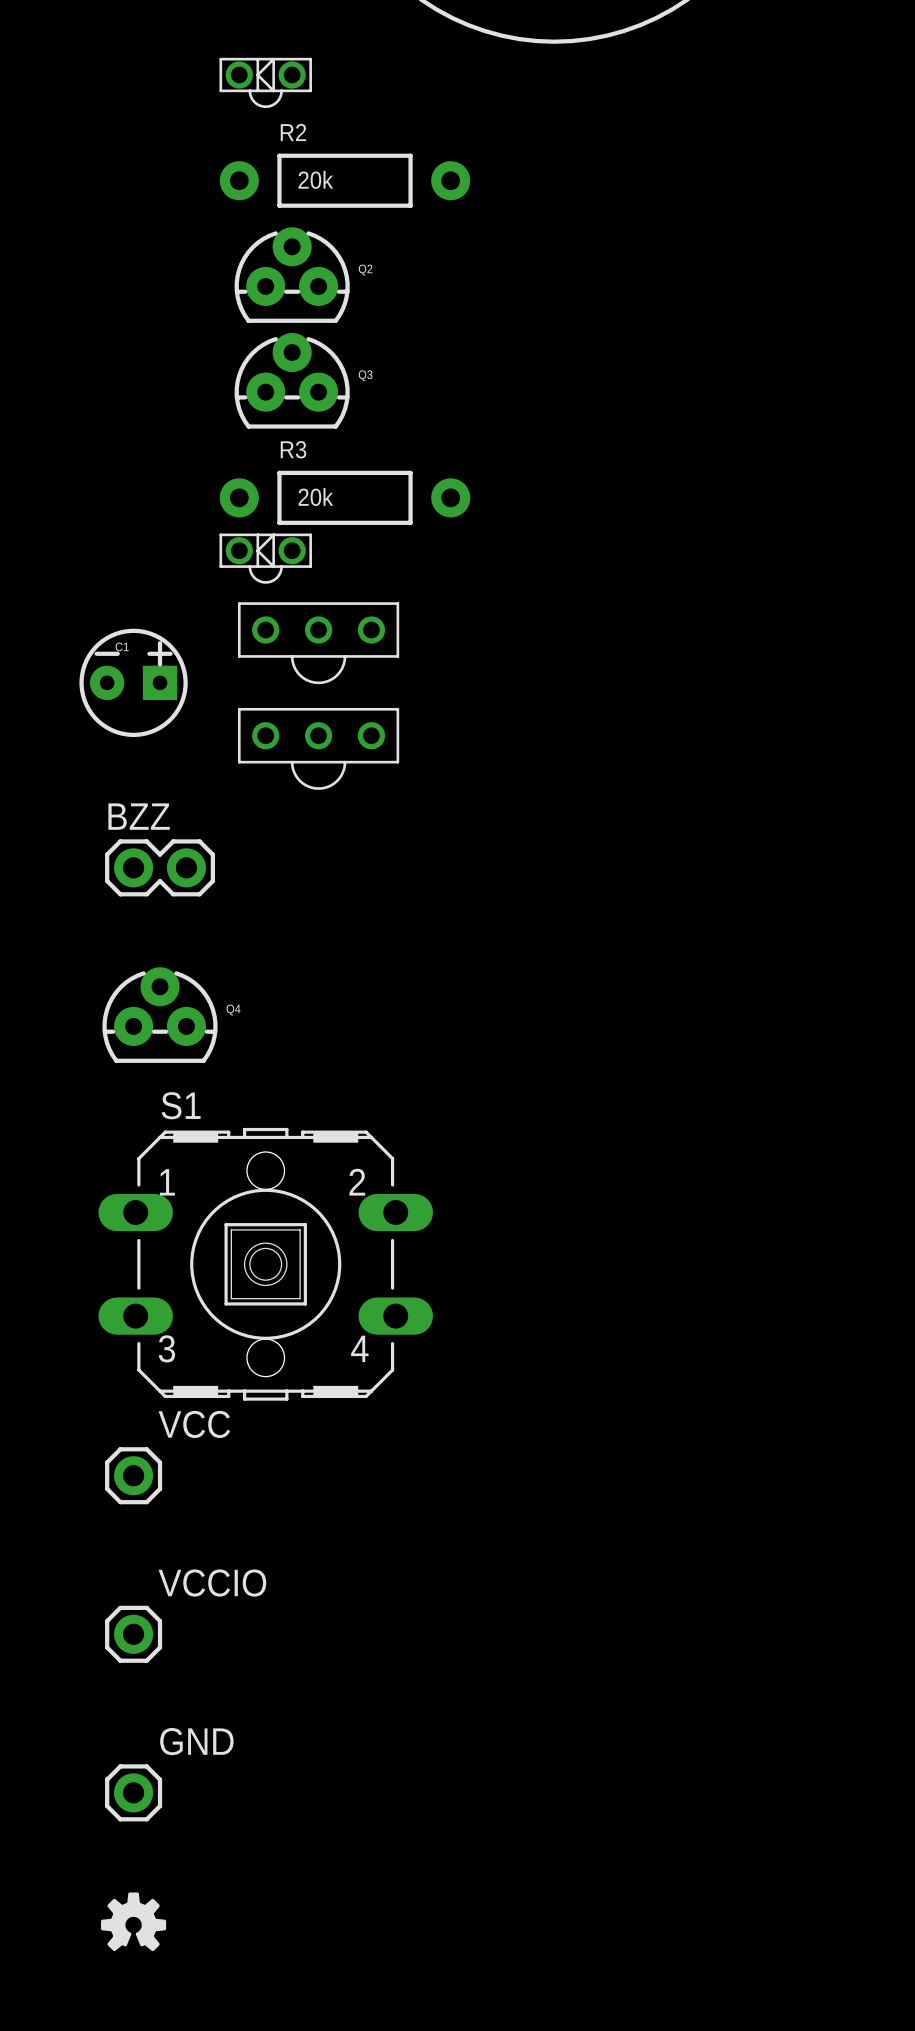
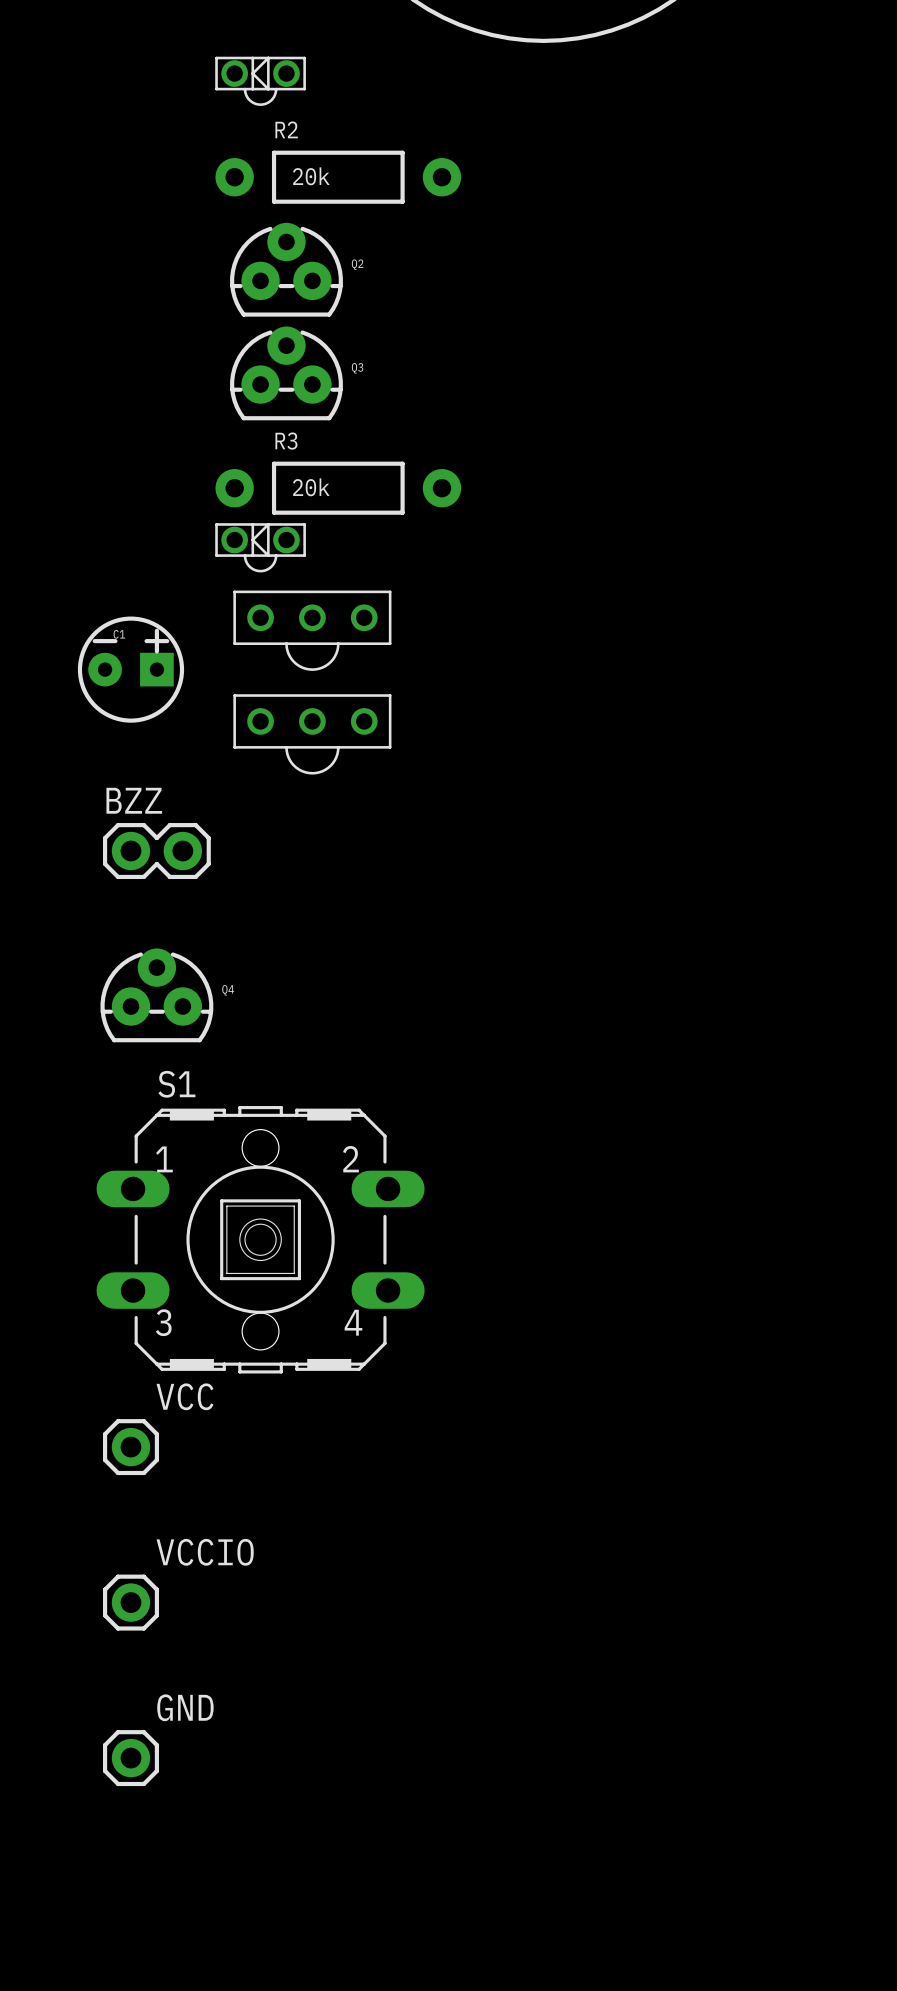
drawing: [101, 1892, 167, 1952] -> none

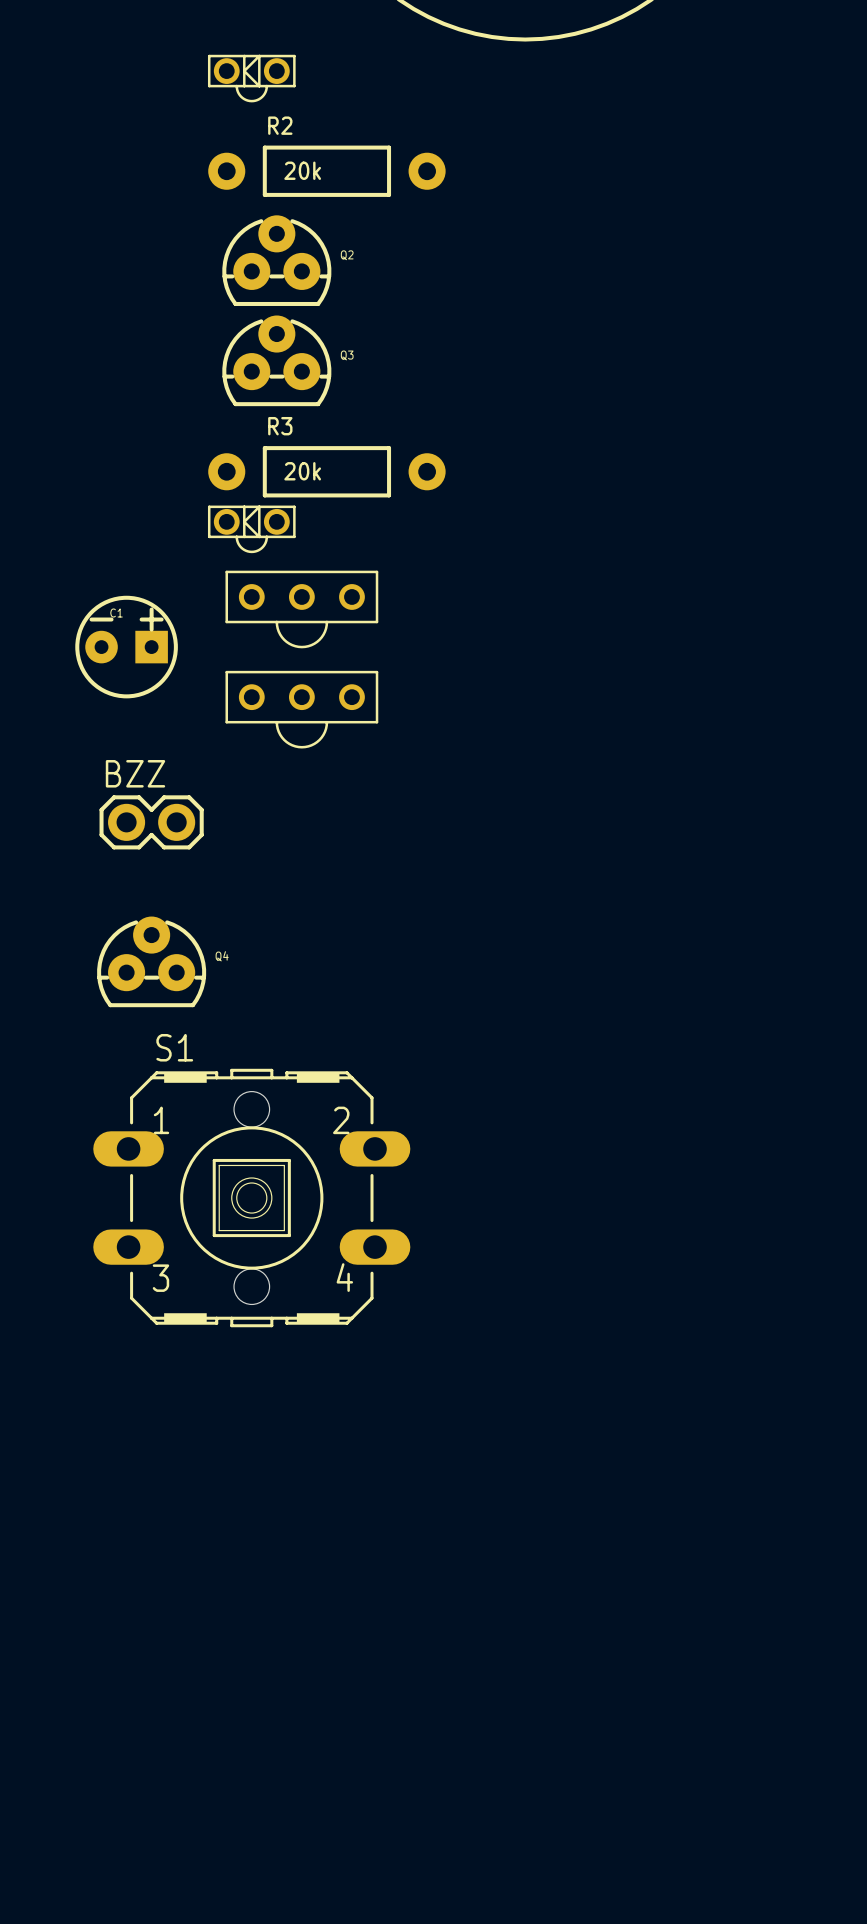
VCC: (130, 1447) -> none
VCCIO: (130, 1602) -> none
GND: (130, 1758) -> none

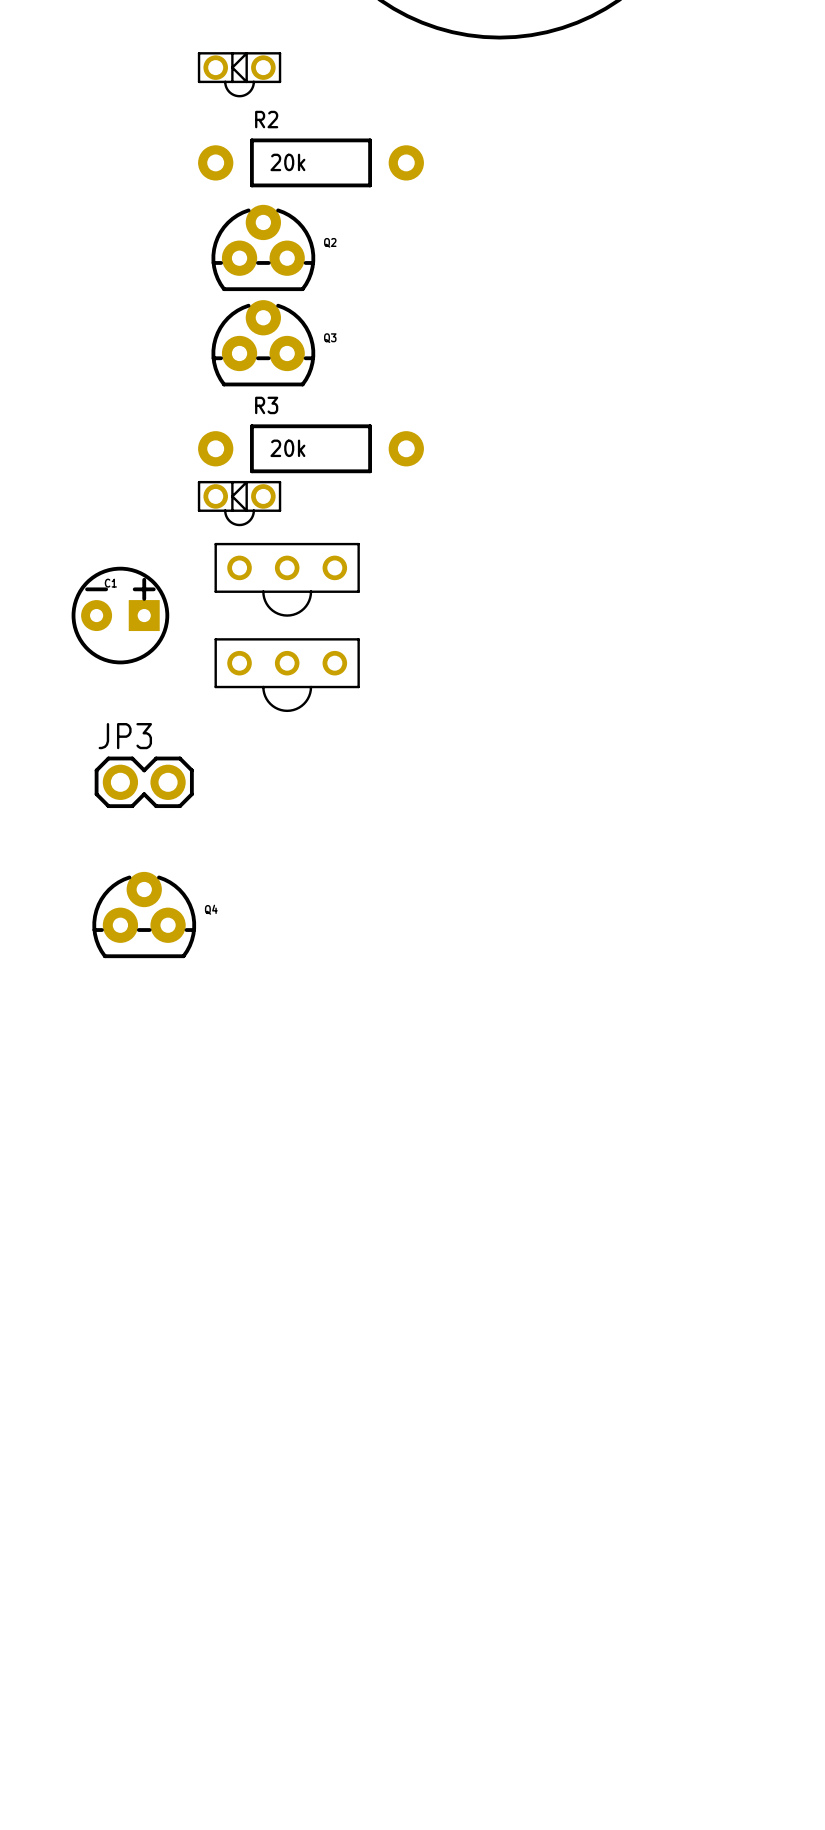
BZZ name: BZZ (135, 773) -> JP3 (125, 736)
S1: (251, 1198) -> none

